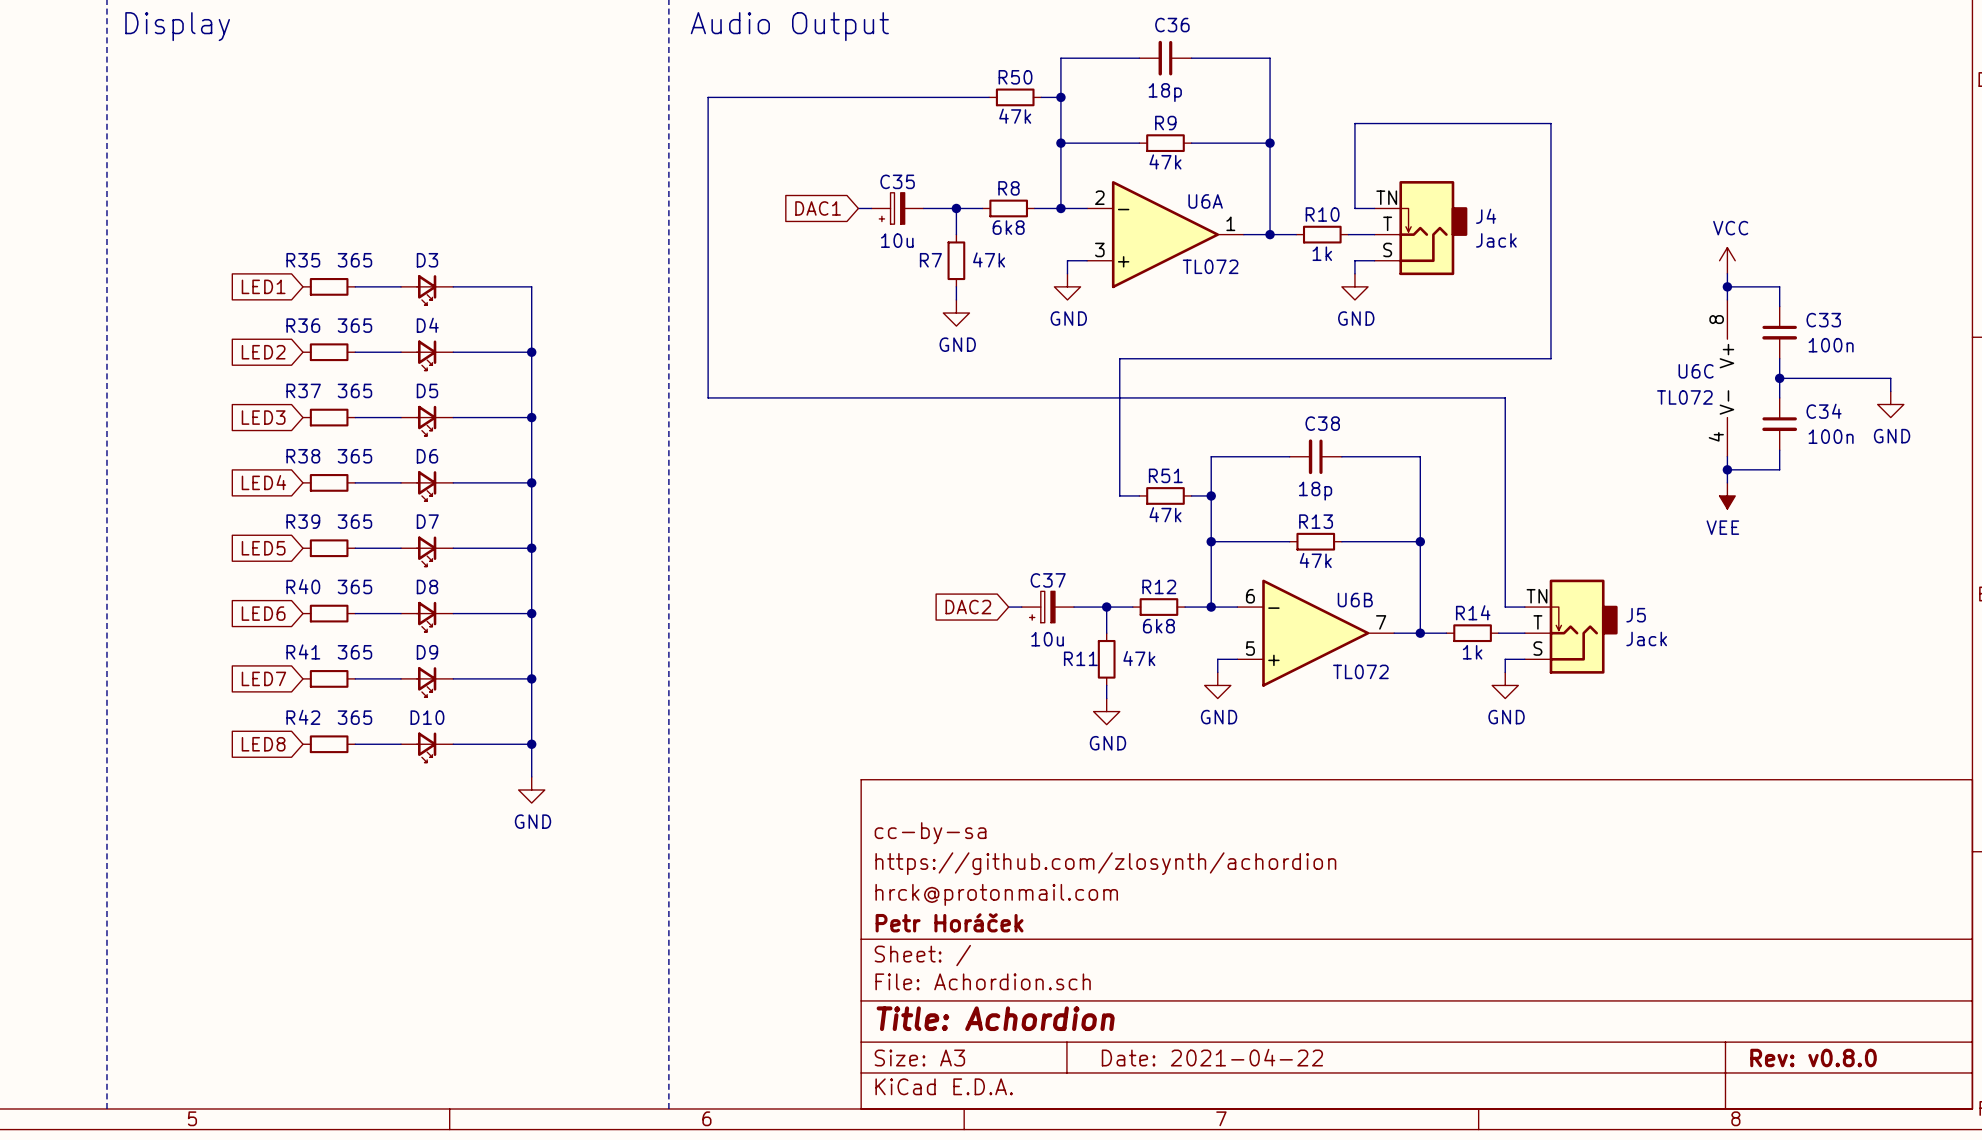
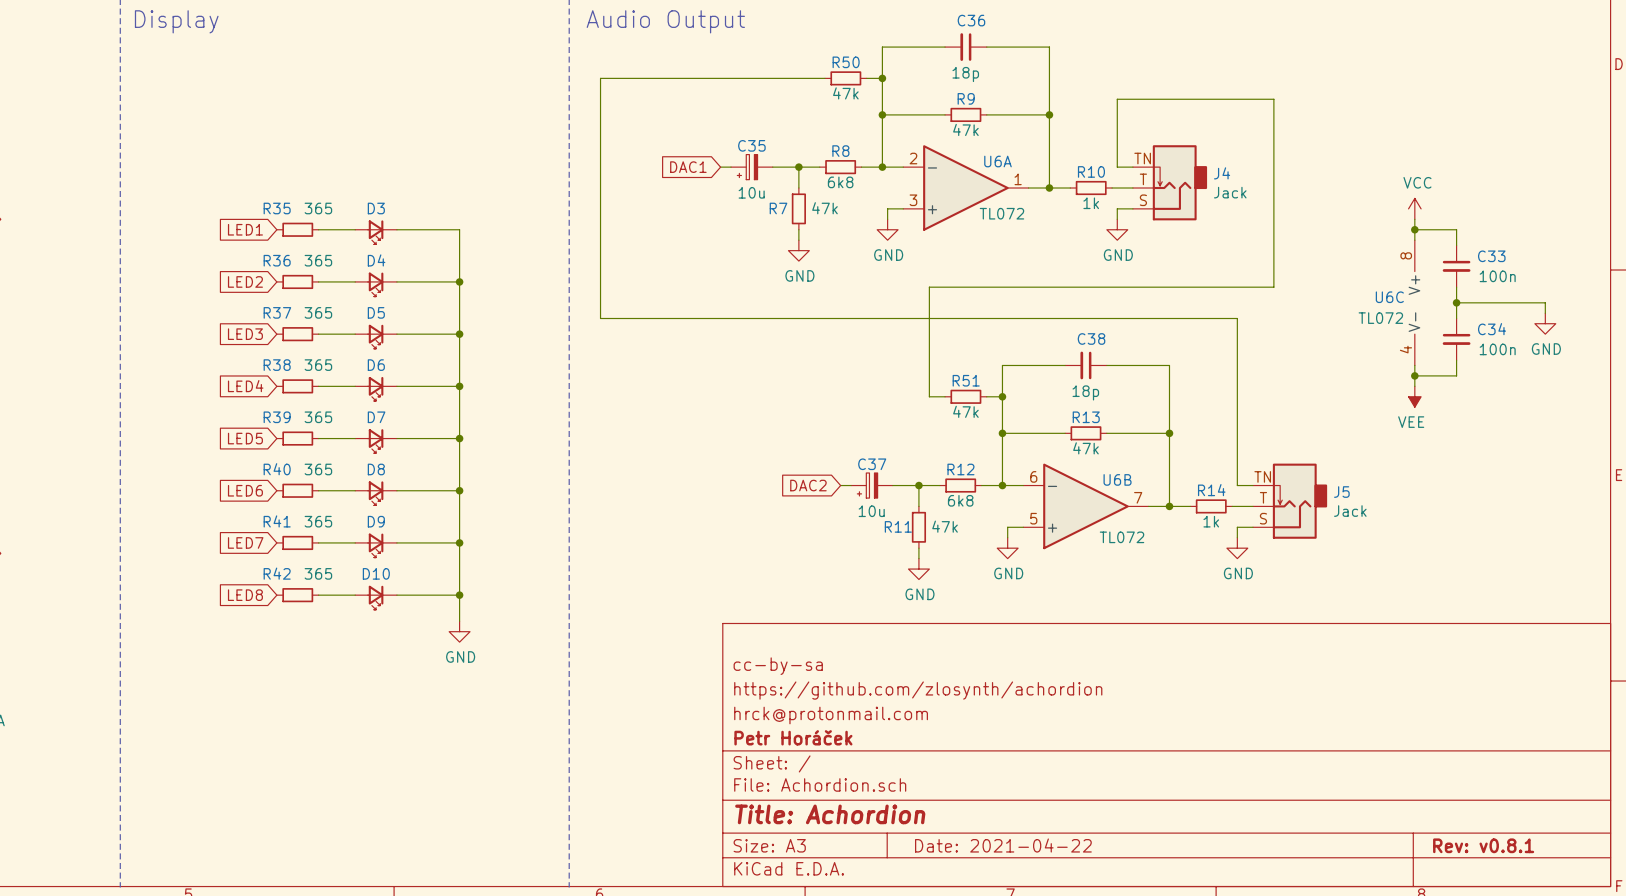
title block: Rev: v0.8.0 (1813, 1058) -> Rev: v0.8.1 (1483, 845)

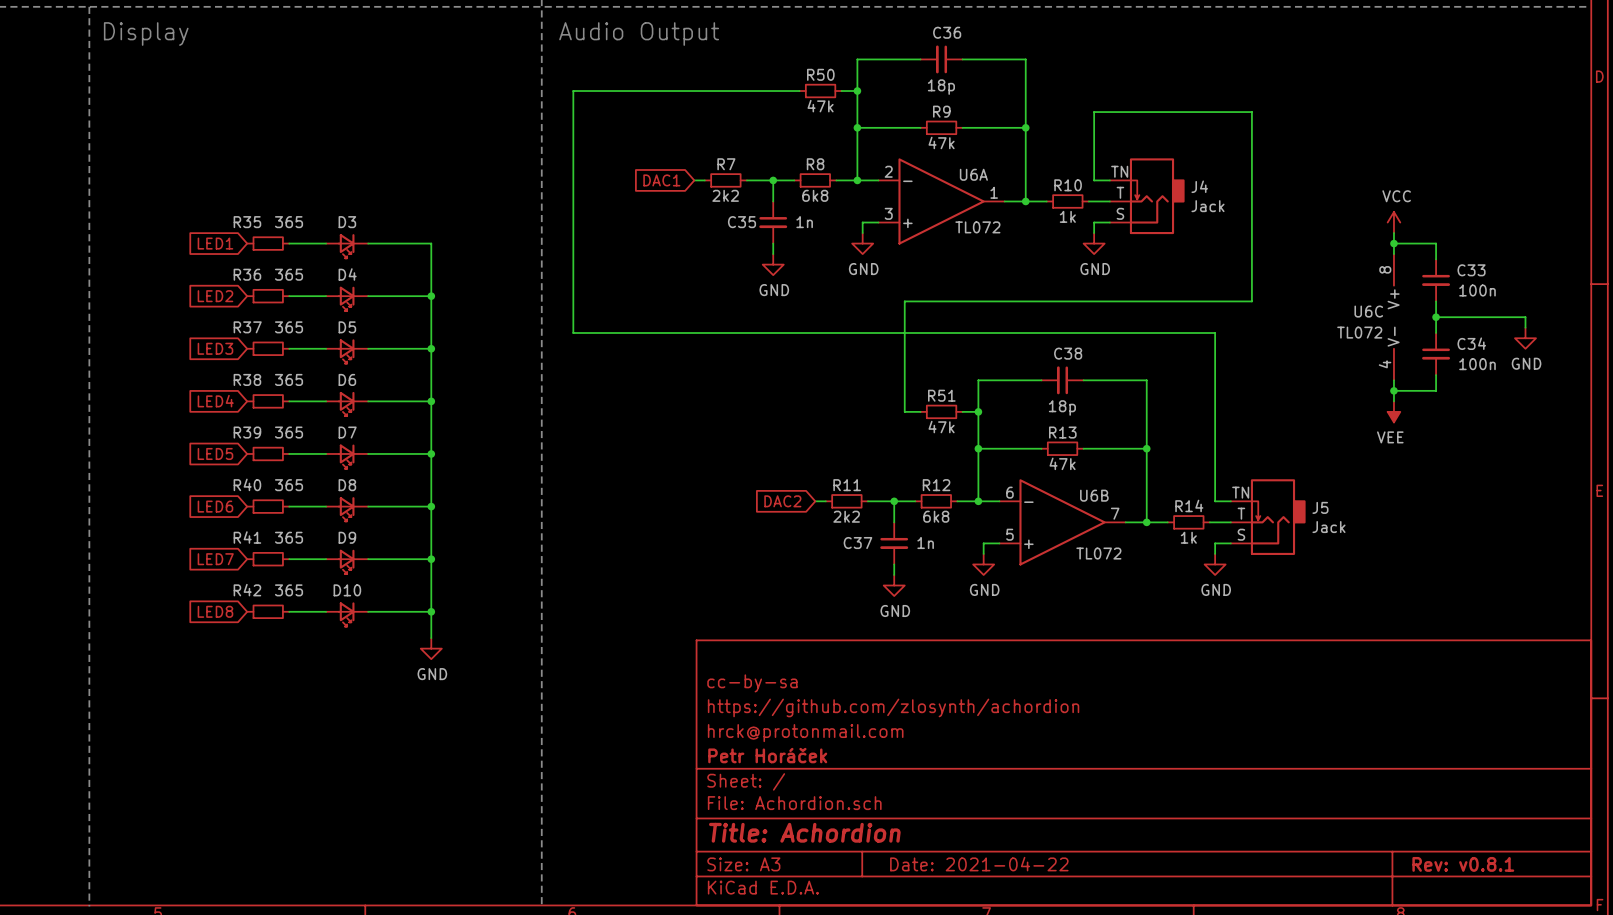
C35 name position: C35 (751, 145) -> C35 (742, 222)
C35 symbol: [731, 154, 773, 180] -> [759, 201, 788, 244]
C35 value: 10u (751, 192) -> 1n (804, 222)
R7 rotation: 0° (798, 208) -> 90° clockwise (725, 180)
R7 position: (798, 208) -> (725, 180)
R7 value: 47k (824, 208) -> 2k2 (725, 195)
C37 name position: C37 (872, 464) -> C37 (857, 543)
C37 symbol: [851, 473, 893, 499] -> [880, 522, 909, 565]
C37 value: 10u (871, 511) -> 1n (925, 543)
R11 value: 47k (945, 526) -> 2k2 (846, 516)
R11 rotation: 0° (918, 527) -> 90° clockwise (846, 501)
R11 position: (918, 527) -> (846, 501)

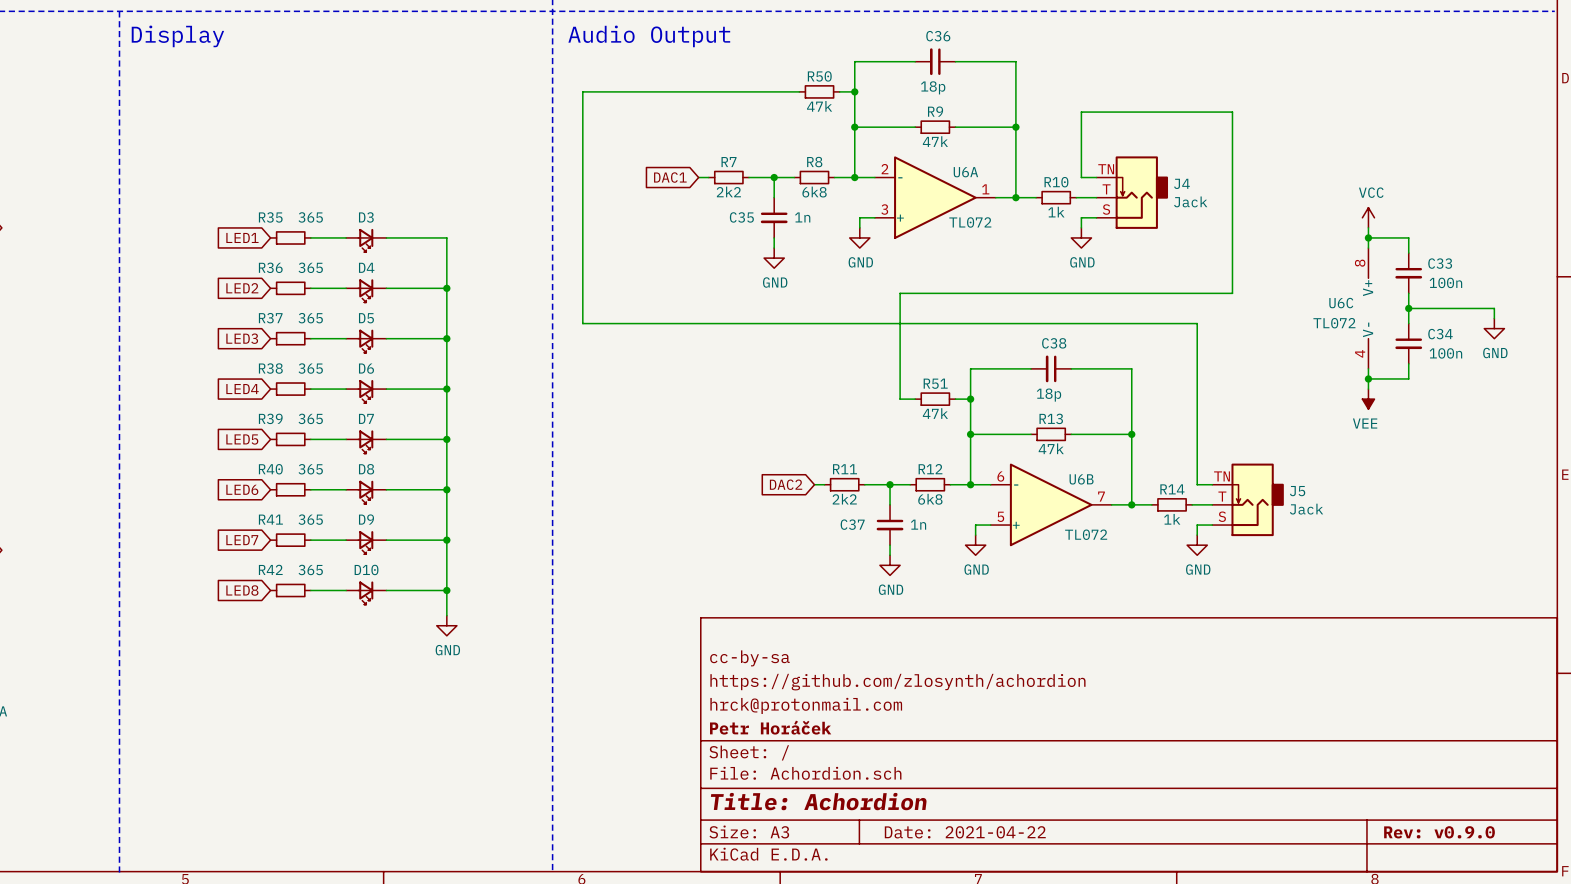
title block: Rev: v0.8.1 (1463, 864) -> Rev: v0.9.0 (1439, 832)

